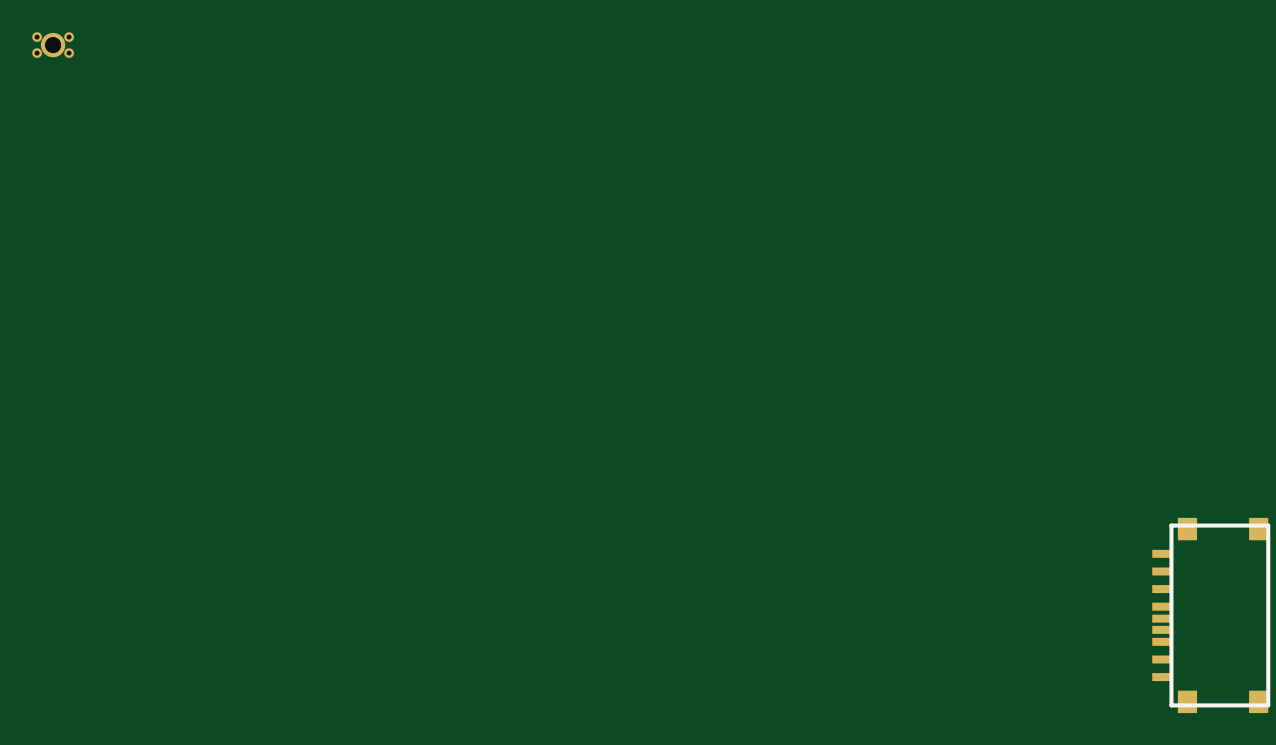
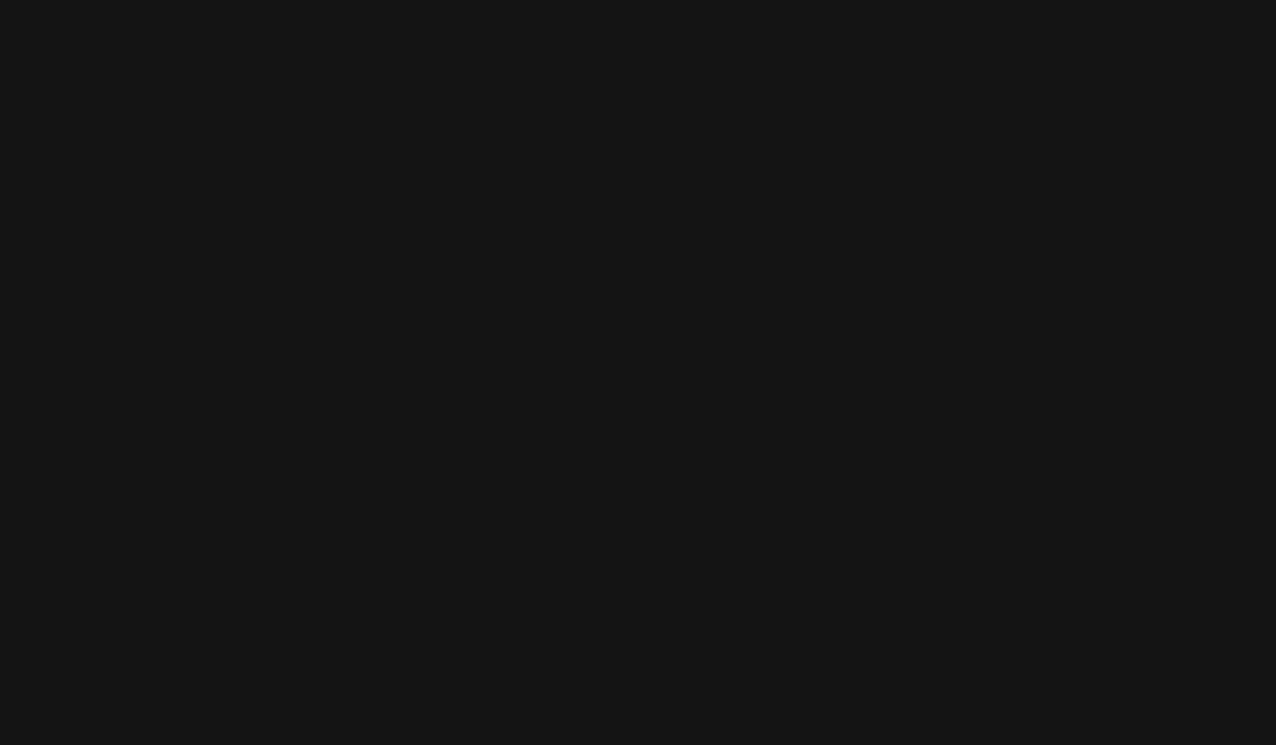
part: (53, 45) -> none
part: (1211, 615) -> none

